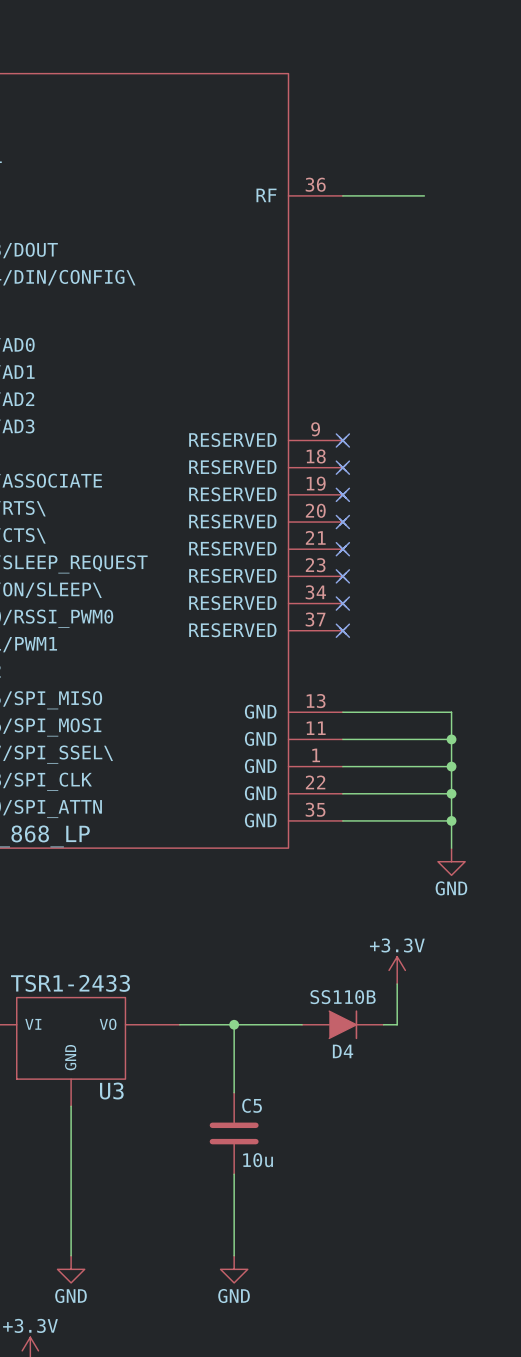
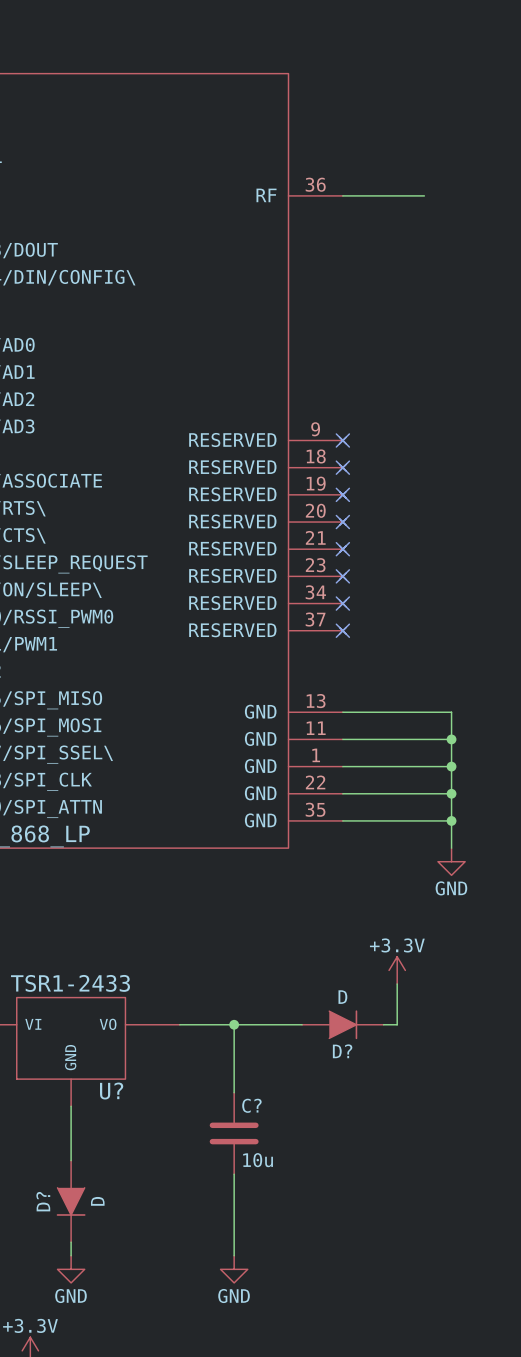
D4 value: SS110B (343, 997) -> D (342, 997)
D4 name: D4 (343, 1051) -> D? (342, 1051)
U3 name: U3 (111, 1091) -> U? (111, 1091)
C5 name: C5 (252, 1105) -> C? (251, 1105)
D?: none -> D (71, 1201)

